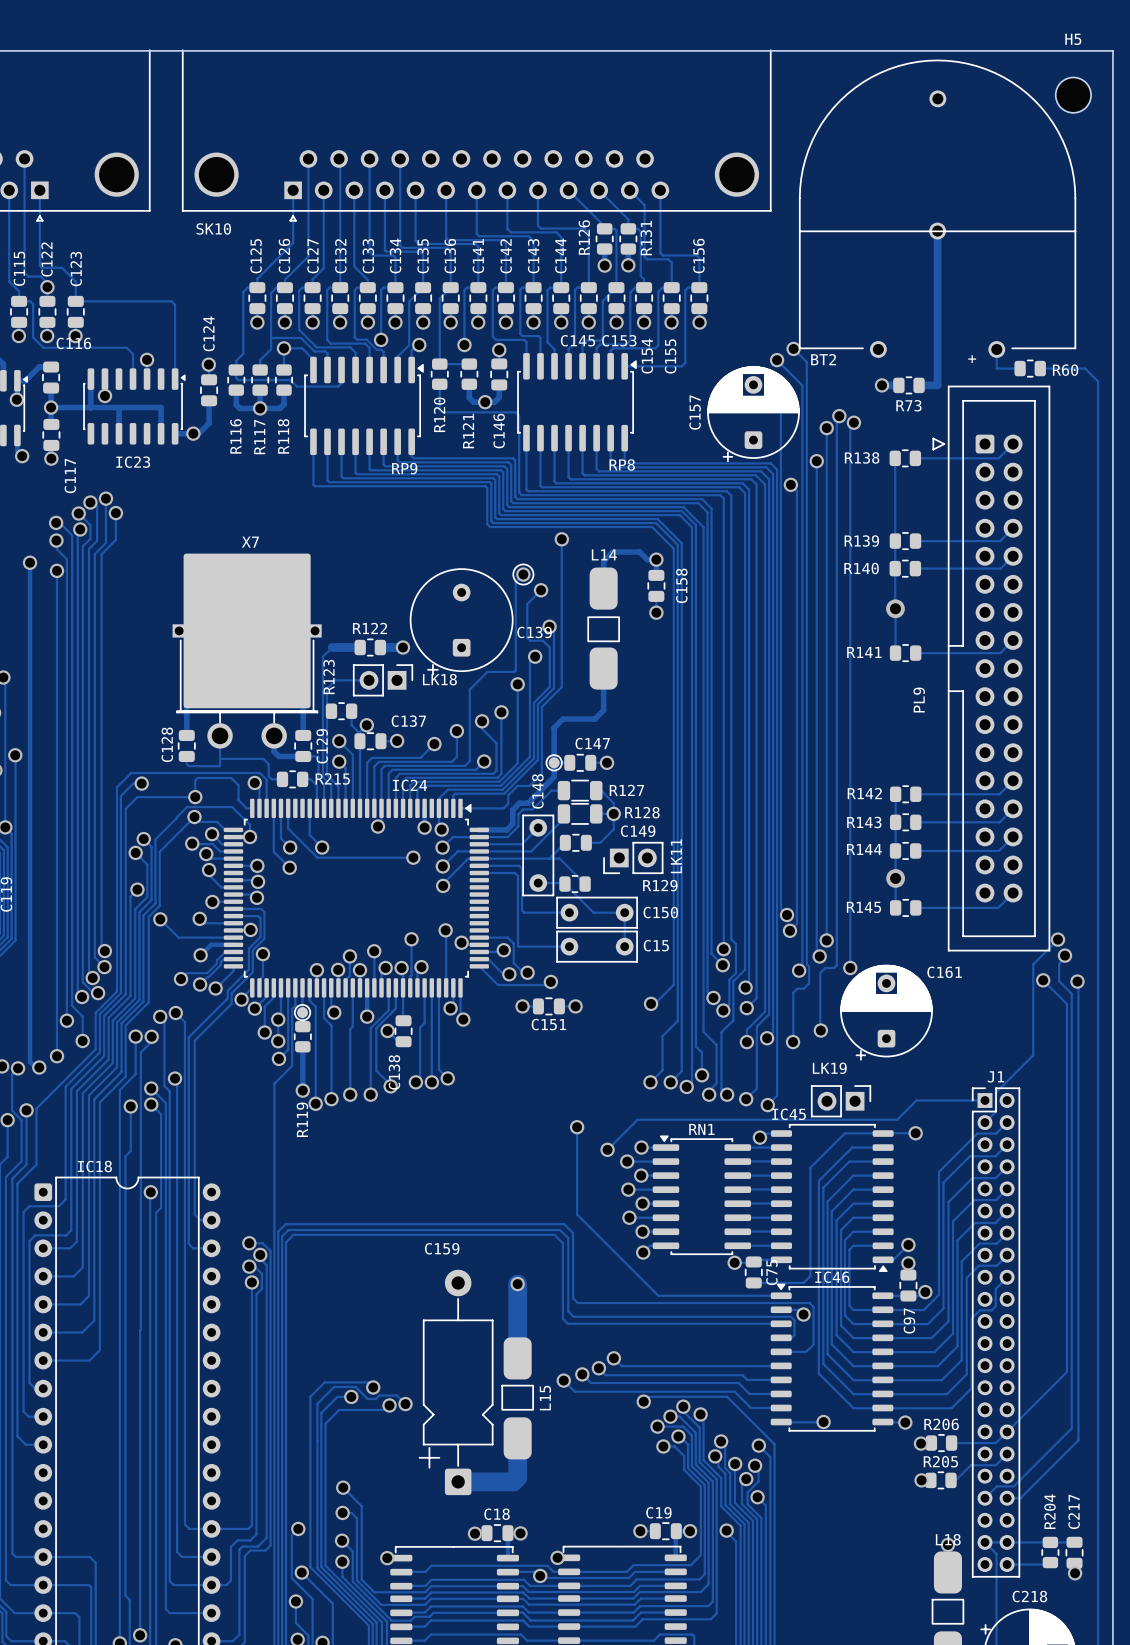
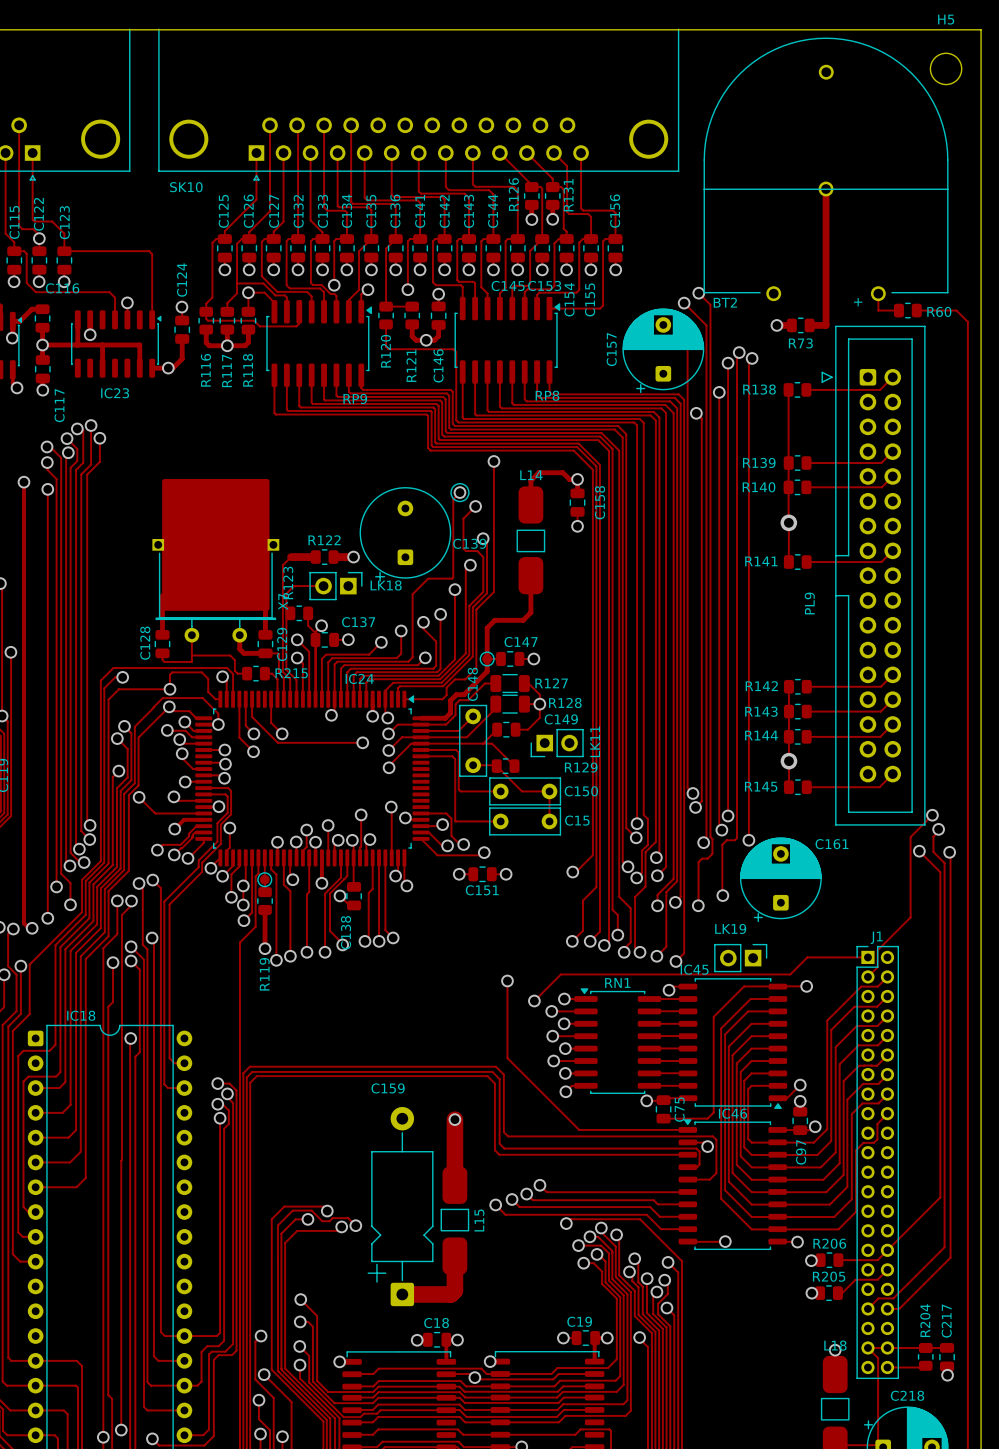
X7 name rotation: 0° (250, 542) -> 90° counterclockwise (283, 601)
X7 name position: X7 (250, 542) -> X7 (283, 601)
X7 footprint: [172, 553, 322, 749] -> [152, 478, 280, 643]

